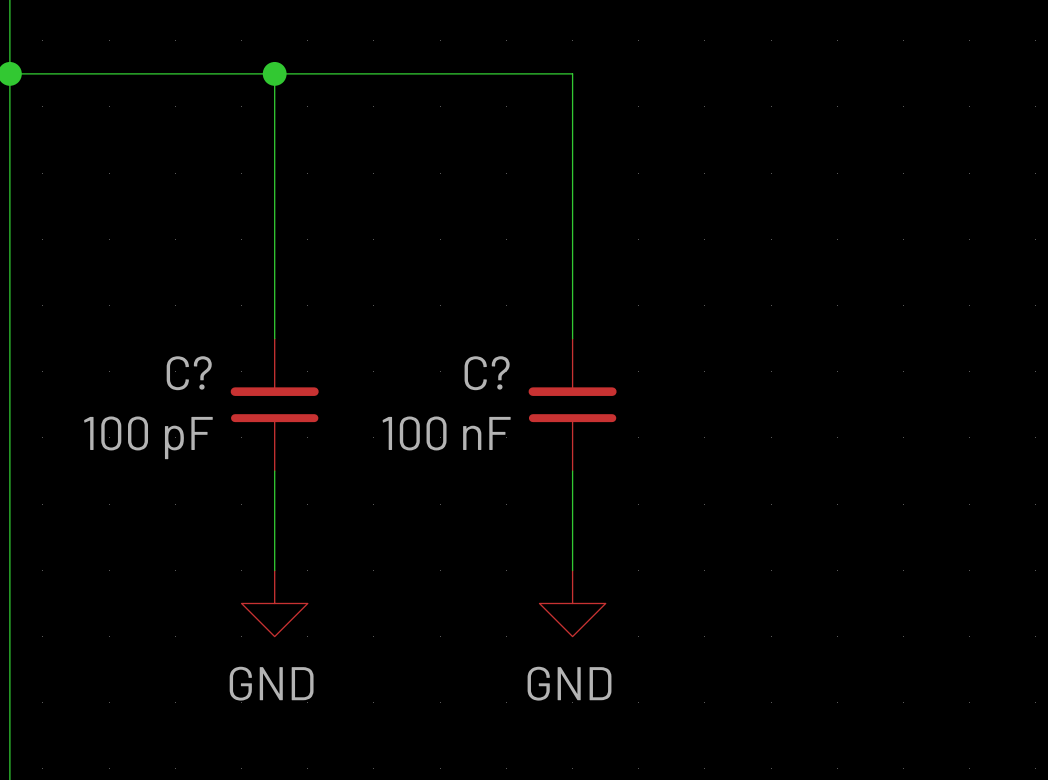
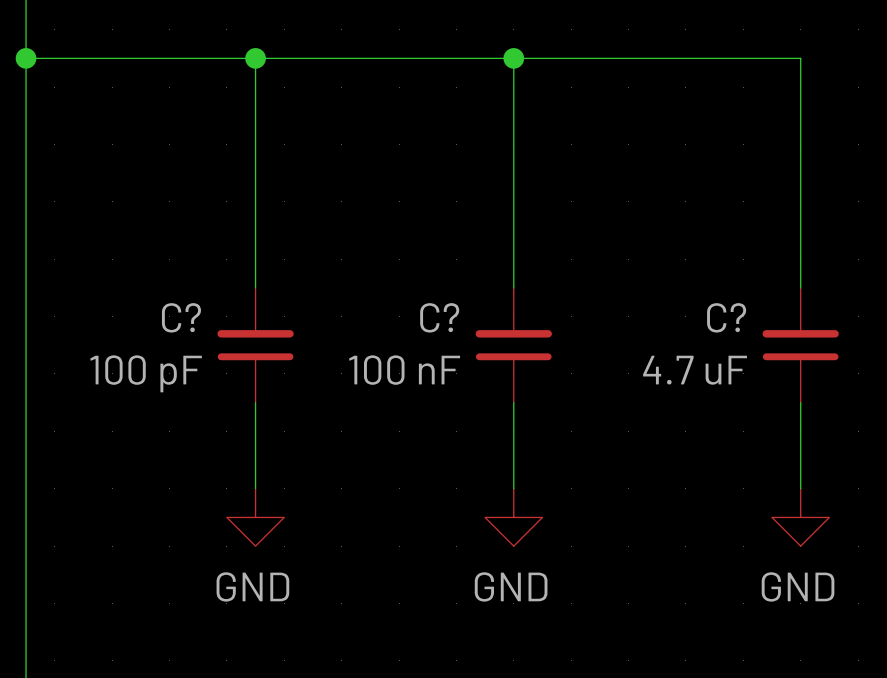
wire: none -> (513, 58) (800, 58) (800, 287)
junction: none -> (513, 58)
C?: none -> 4.7 uF (800, 345)
wire: none -> (800, 402) (800, 488)
power symbol: none -> GND (800, 517)

